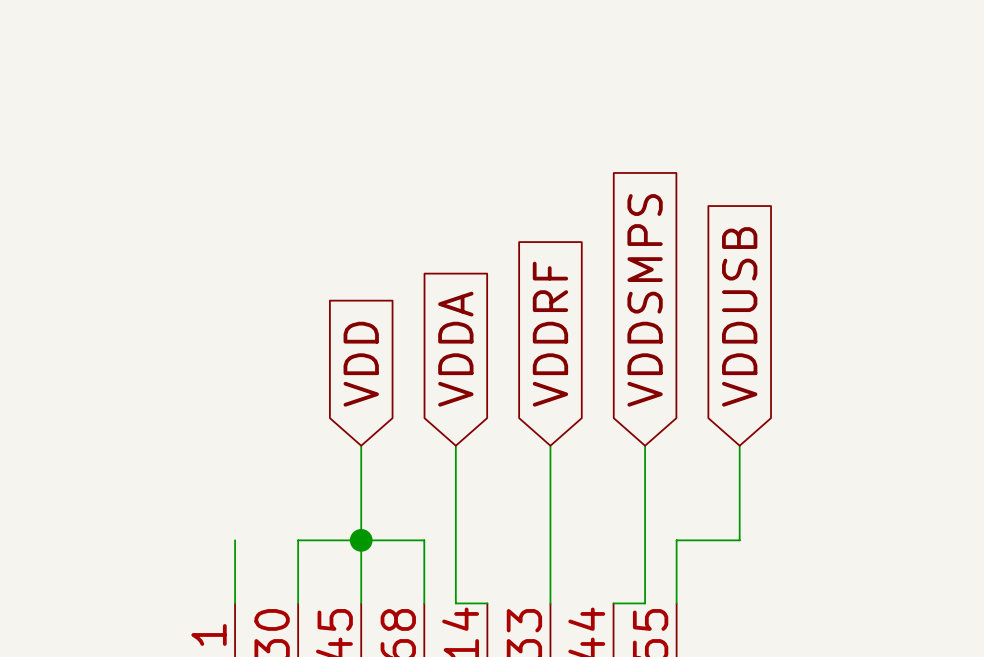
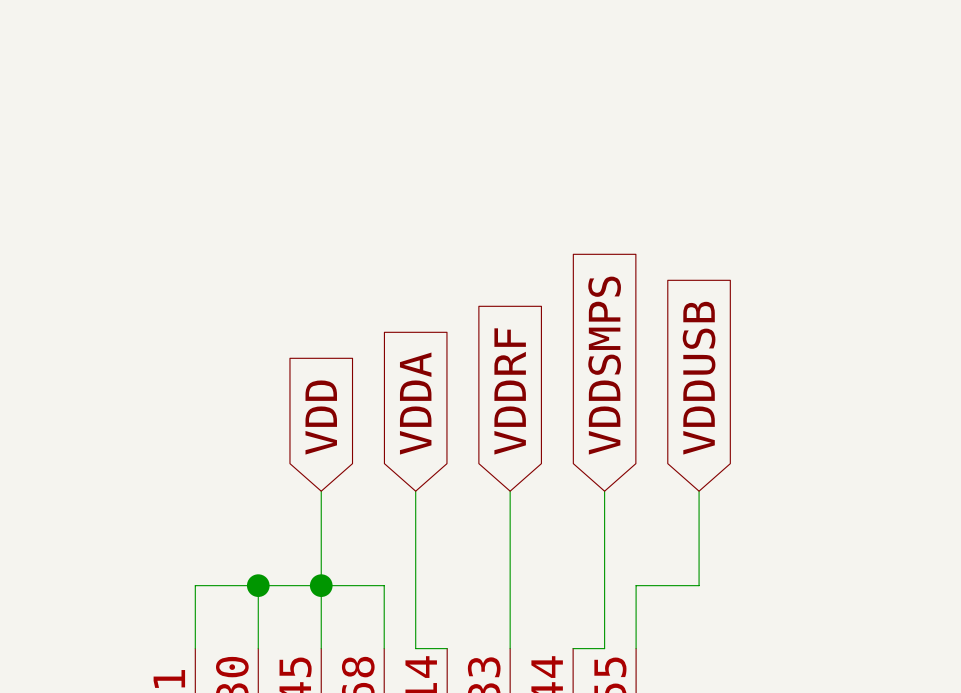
wire: none -> (195, 585) (258, 585)
junction: none -> (258, 585)

